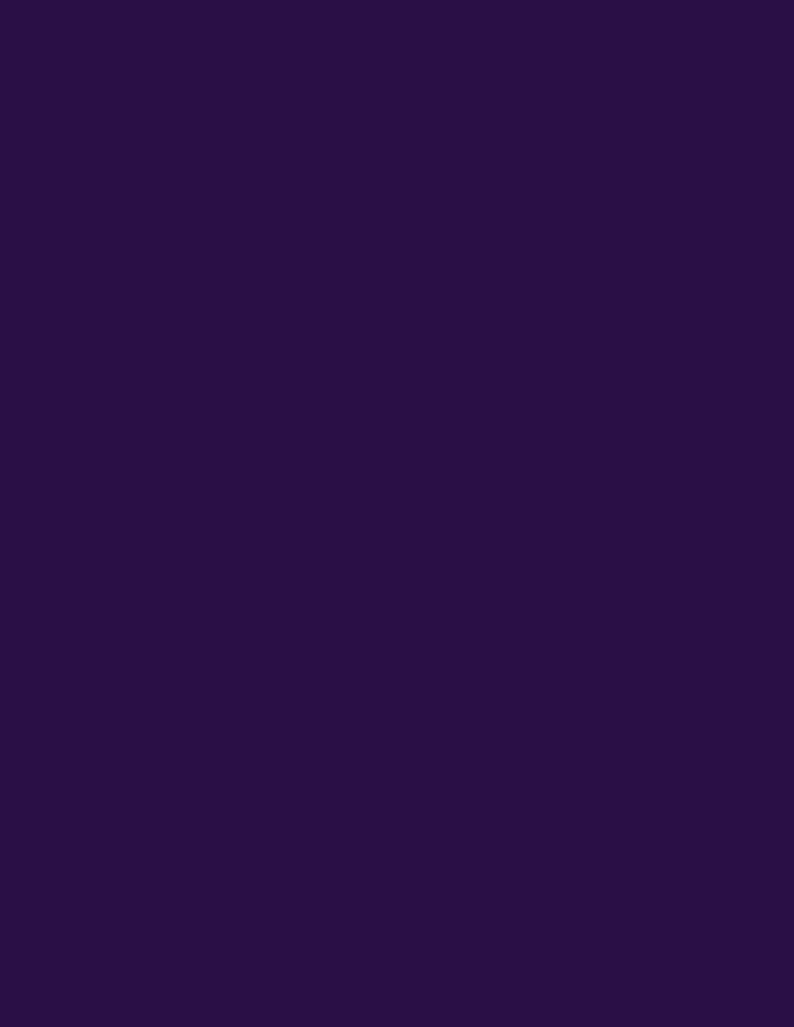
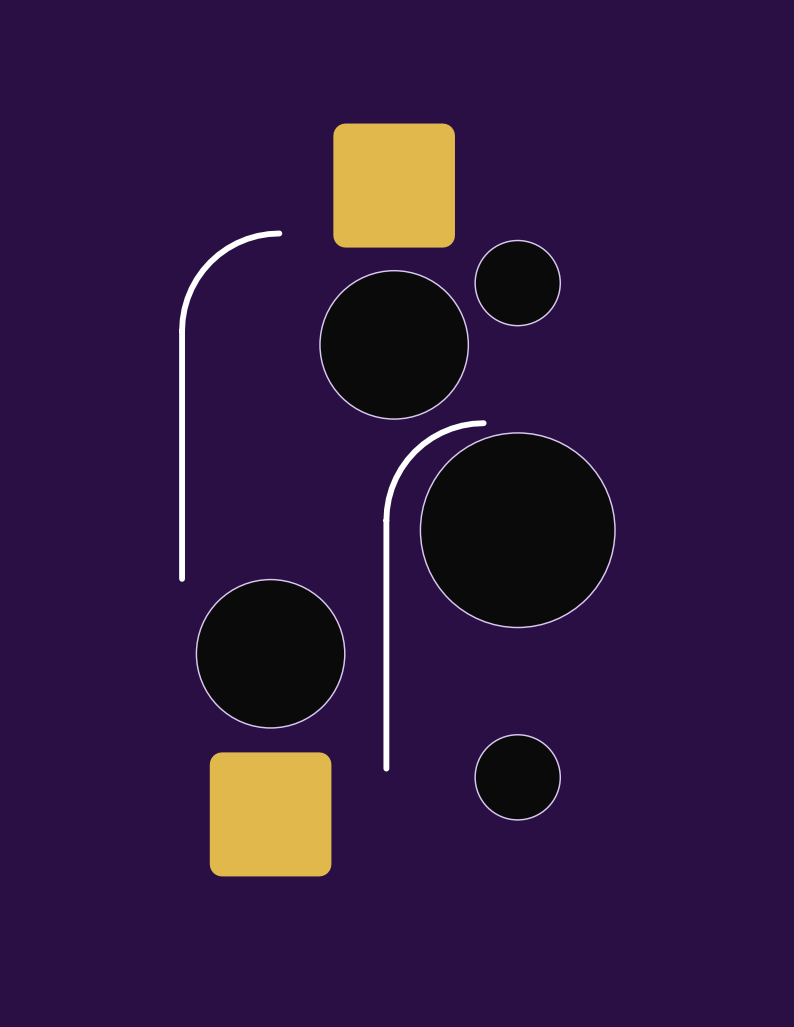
part: none -> (397, 499)

